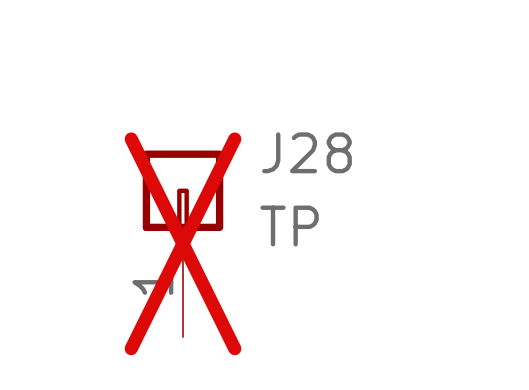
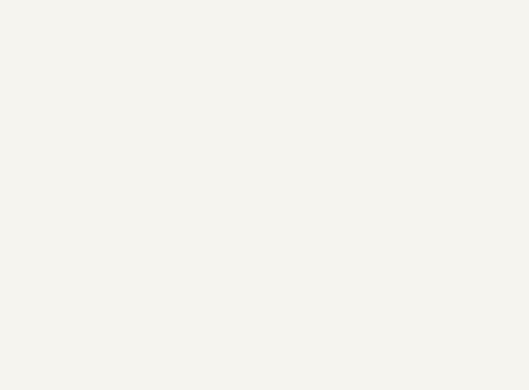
J28: TP (183, 243) -> none

